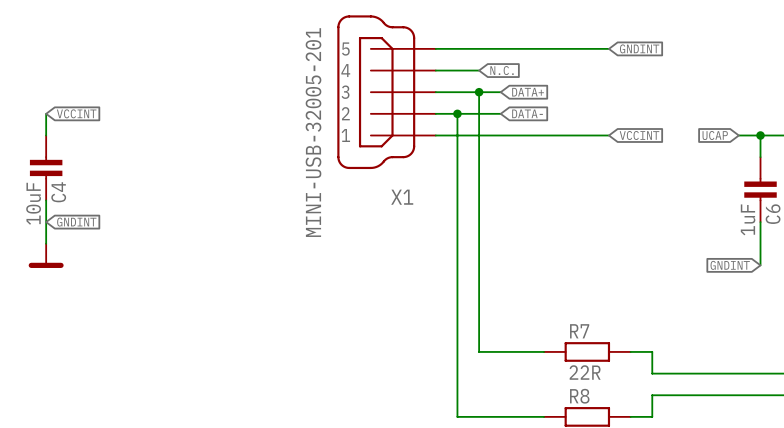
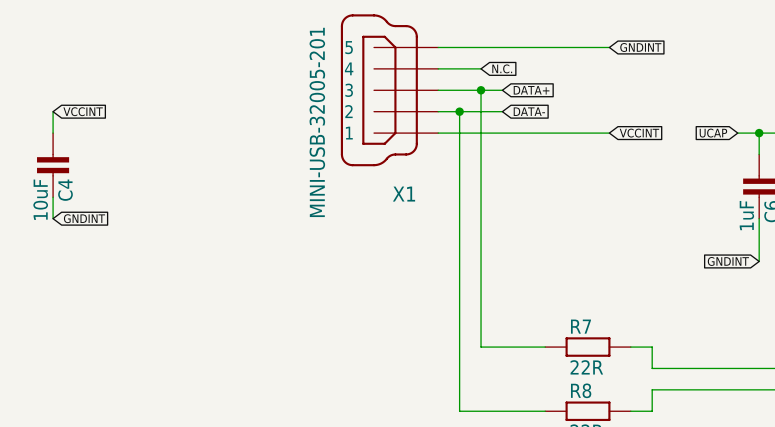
wire: (46, 222) (46, 243) -> none
power symbol: (46, 255) -> none

